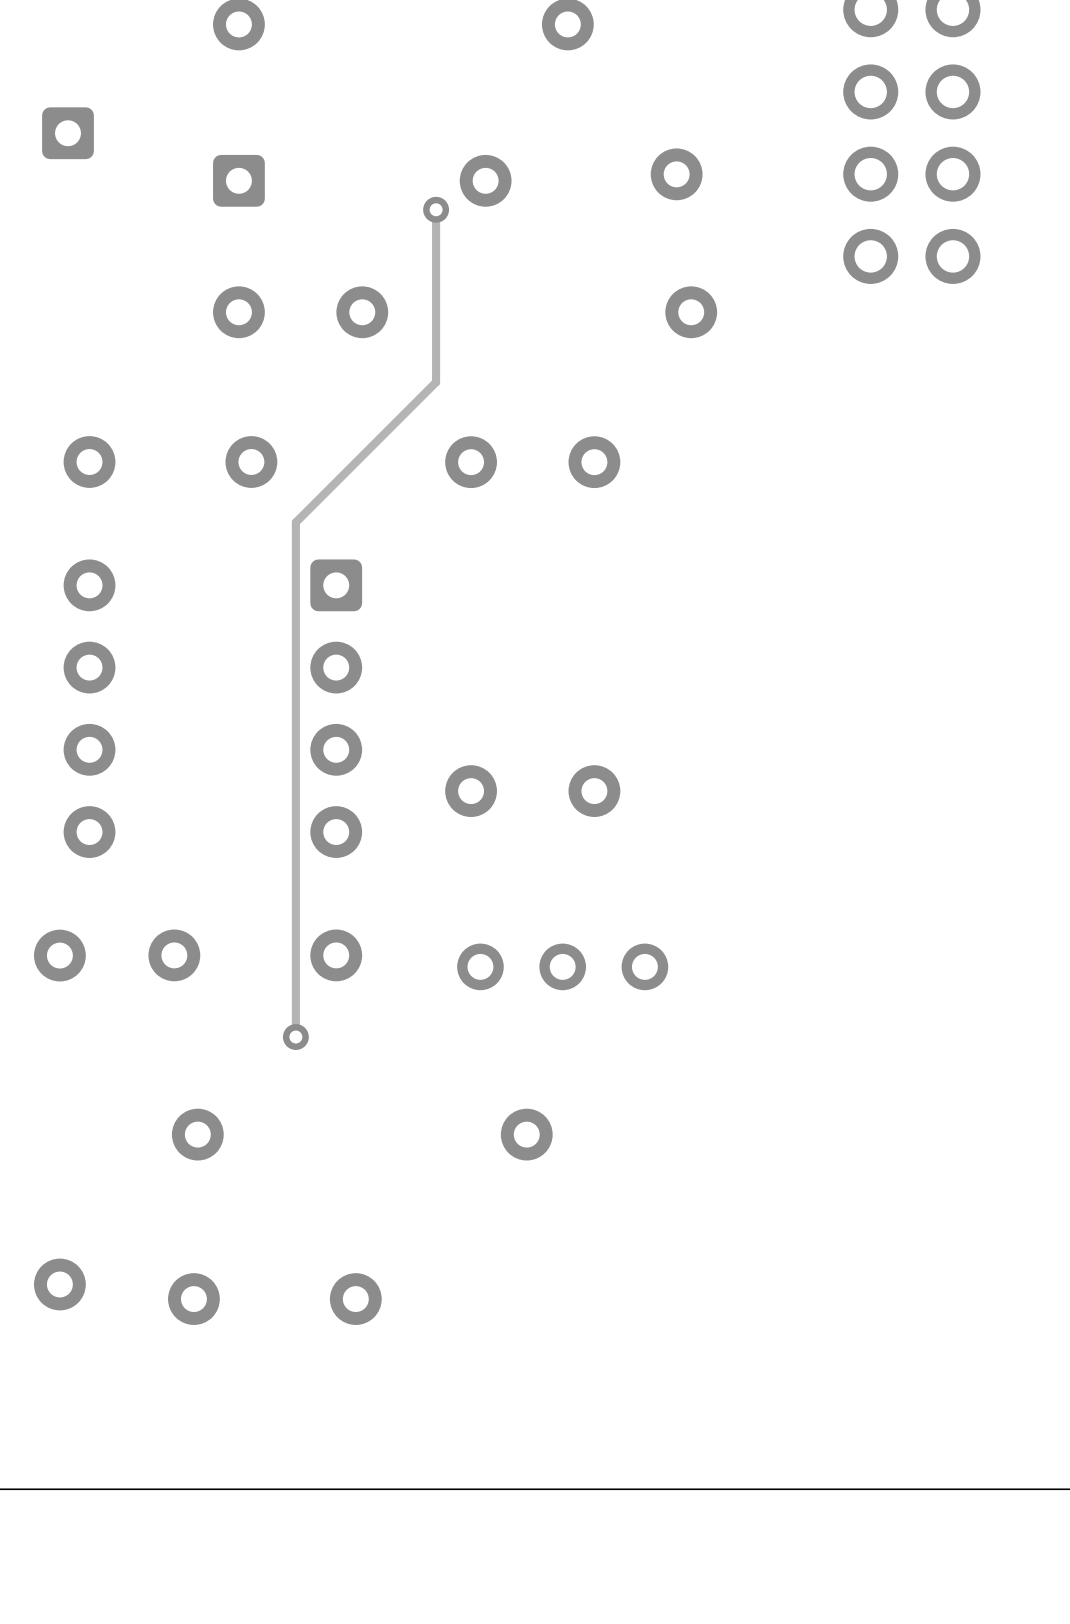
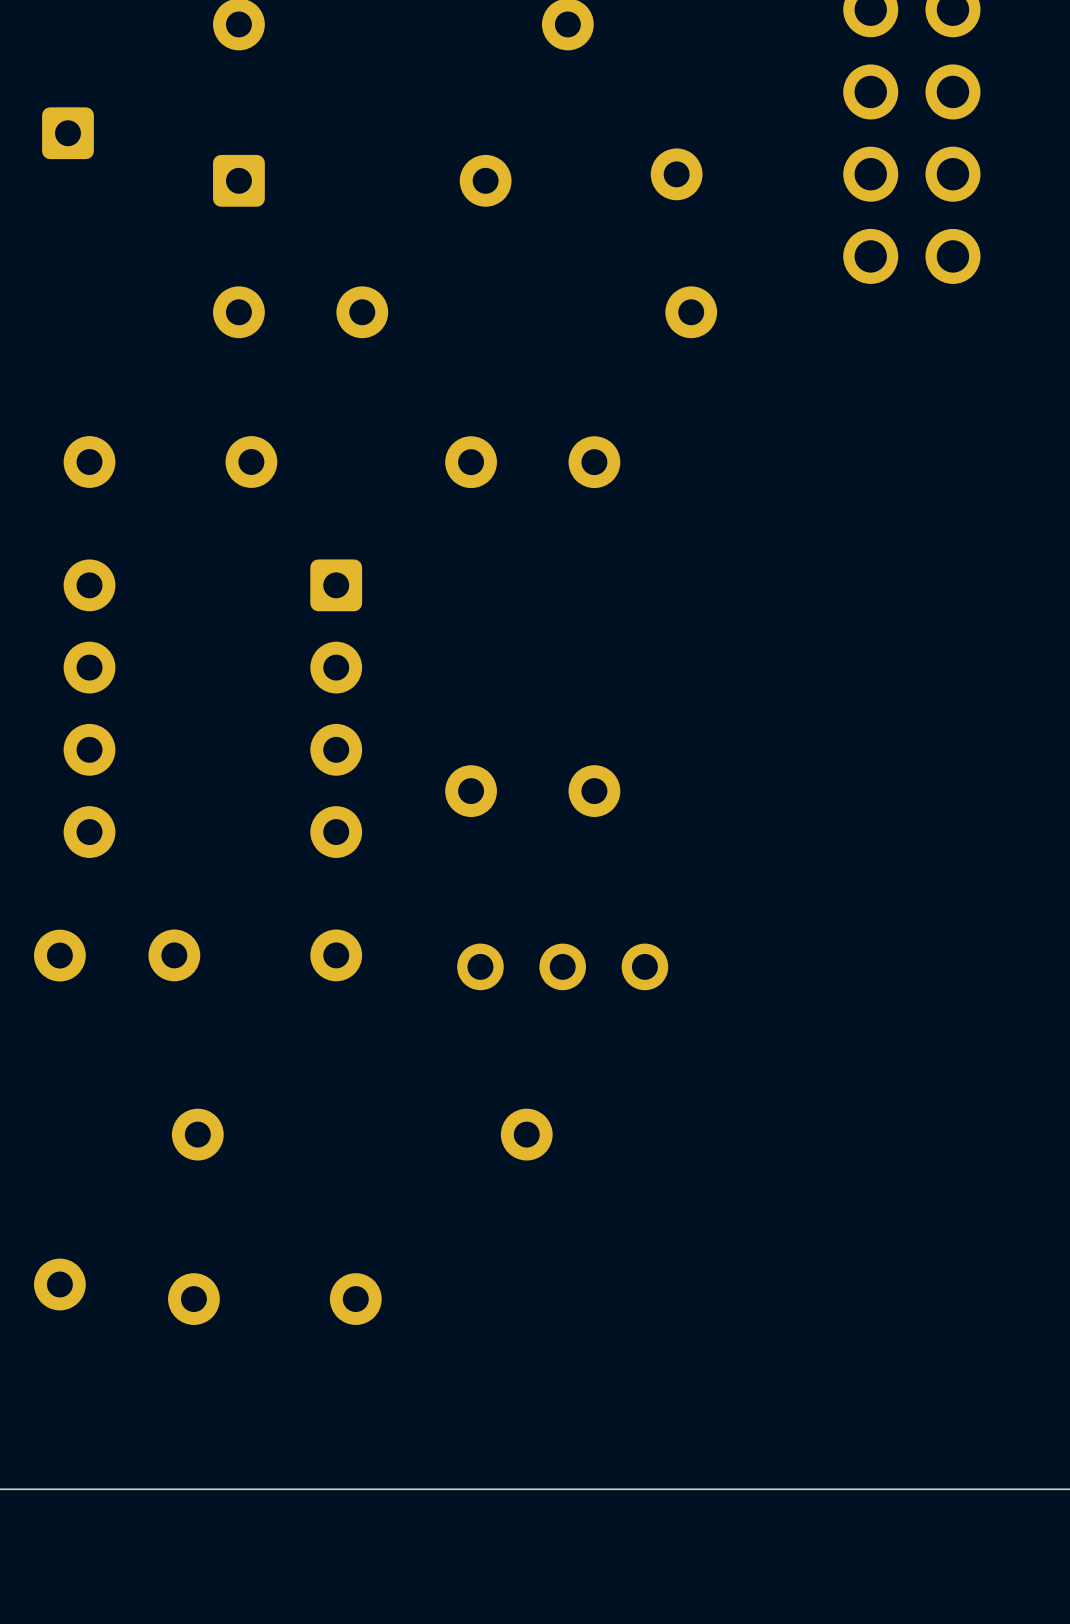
track: (436, 209) (436, 382) (295, 522) (295, 1037) -> none
via: (436, 209) -> none
via: (295, 1037) -> none

